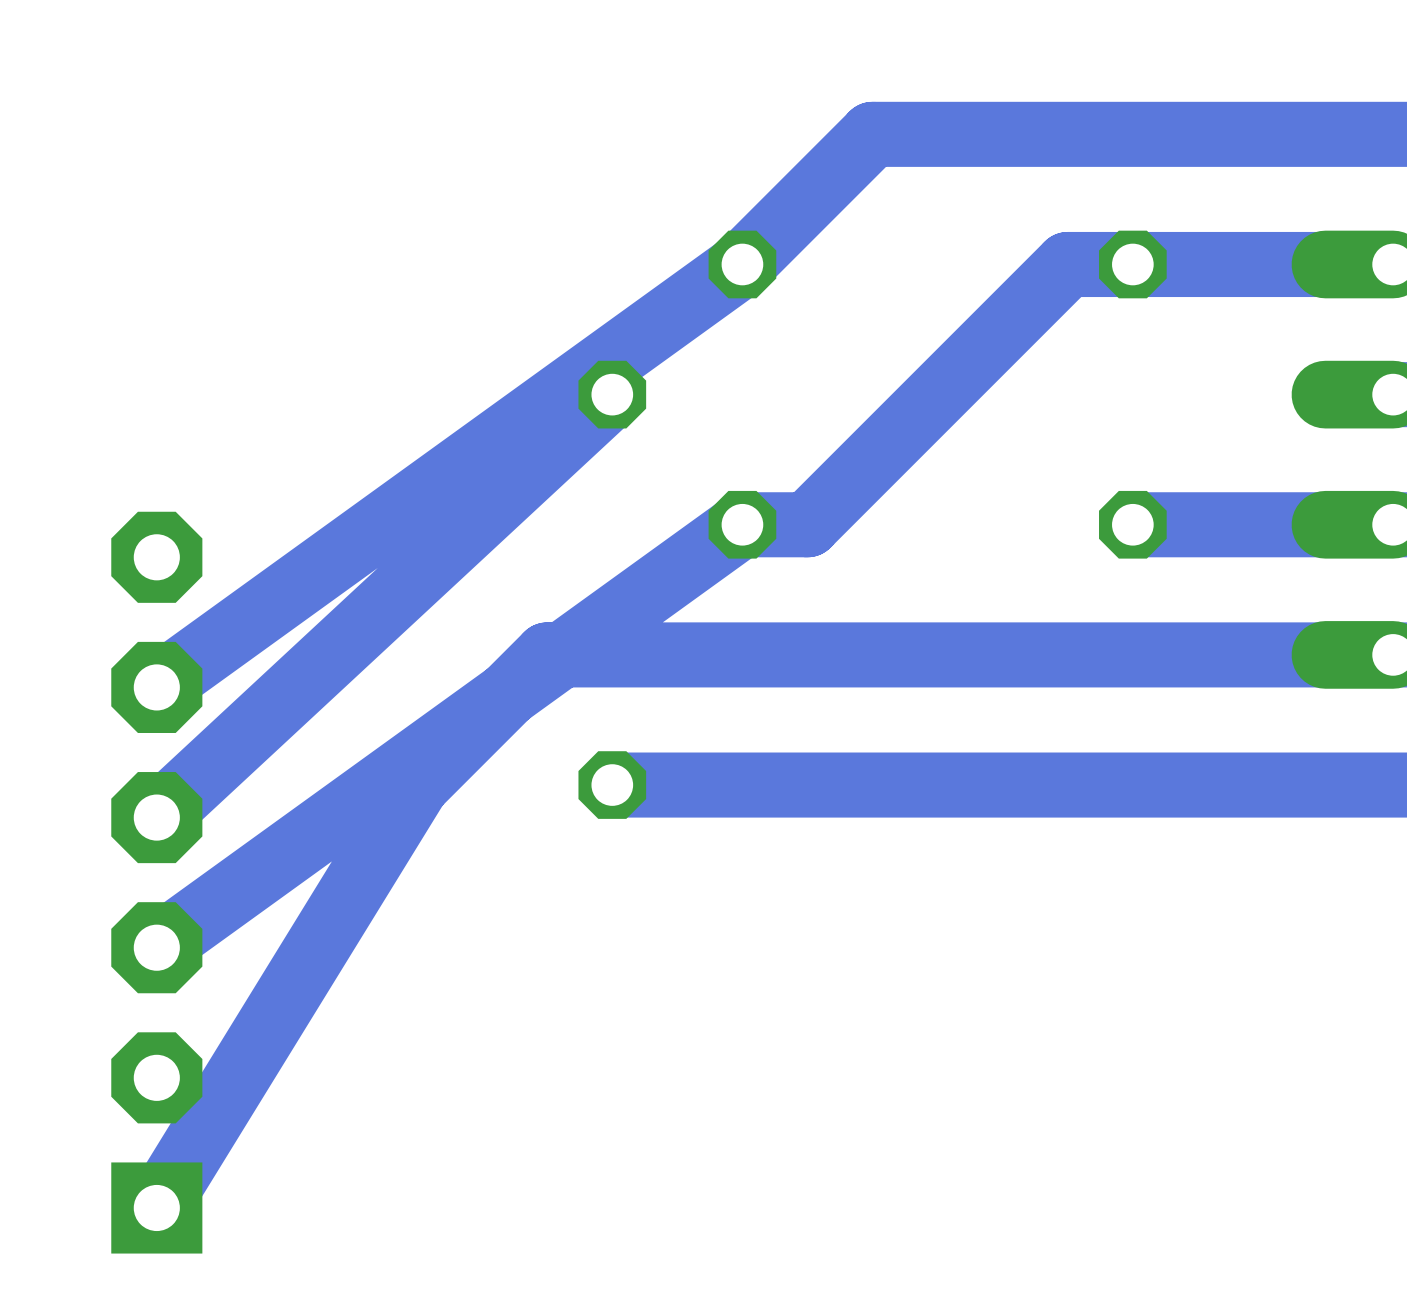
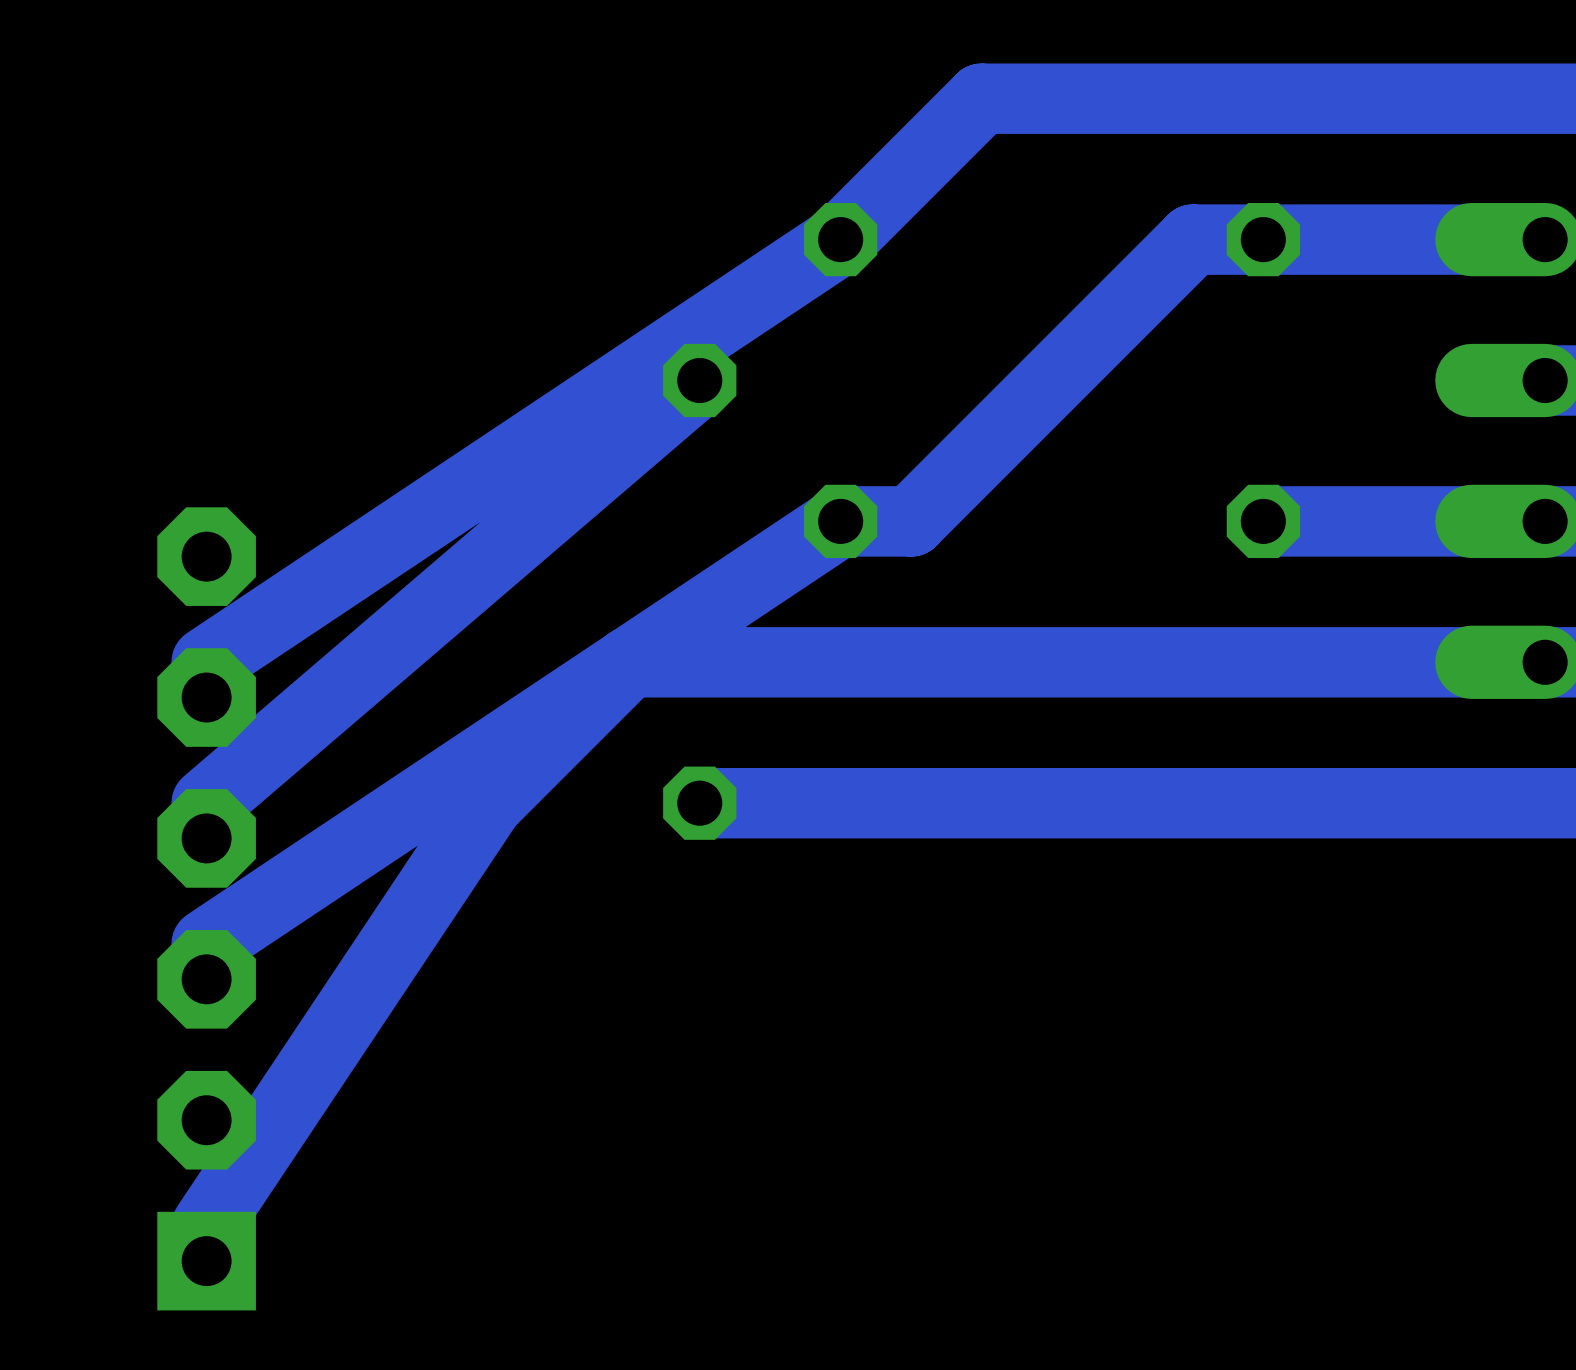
bottom track: (742, 264) (156, 687) -> (840, 239) (206, 662)
bottom track: (612, 394) (156, 817) -> (699, 380) (206, 803)
bottom track: (742, 524) (156, 947) -> (840, 521) (206, 944)
bottom track: (417, 785) (156, 1207) -> (488, 803) (206, 1225)

